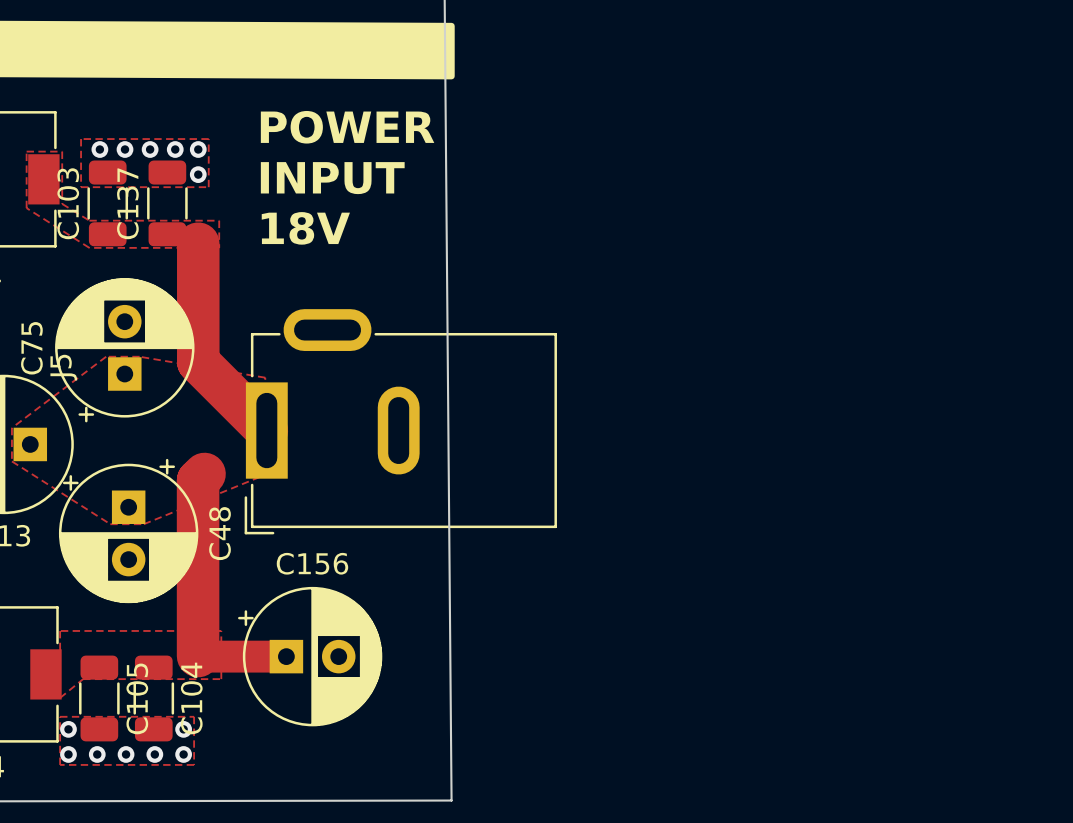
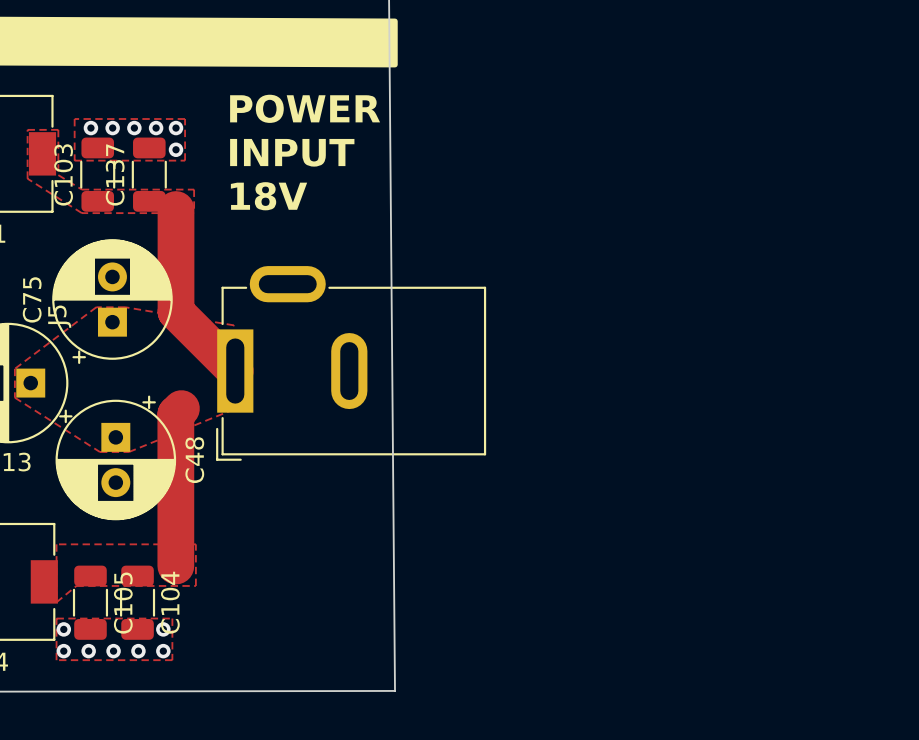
top track: (198, 656) (286, 656) -> none
C156: (310, 656) -> none

